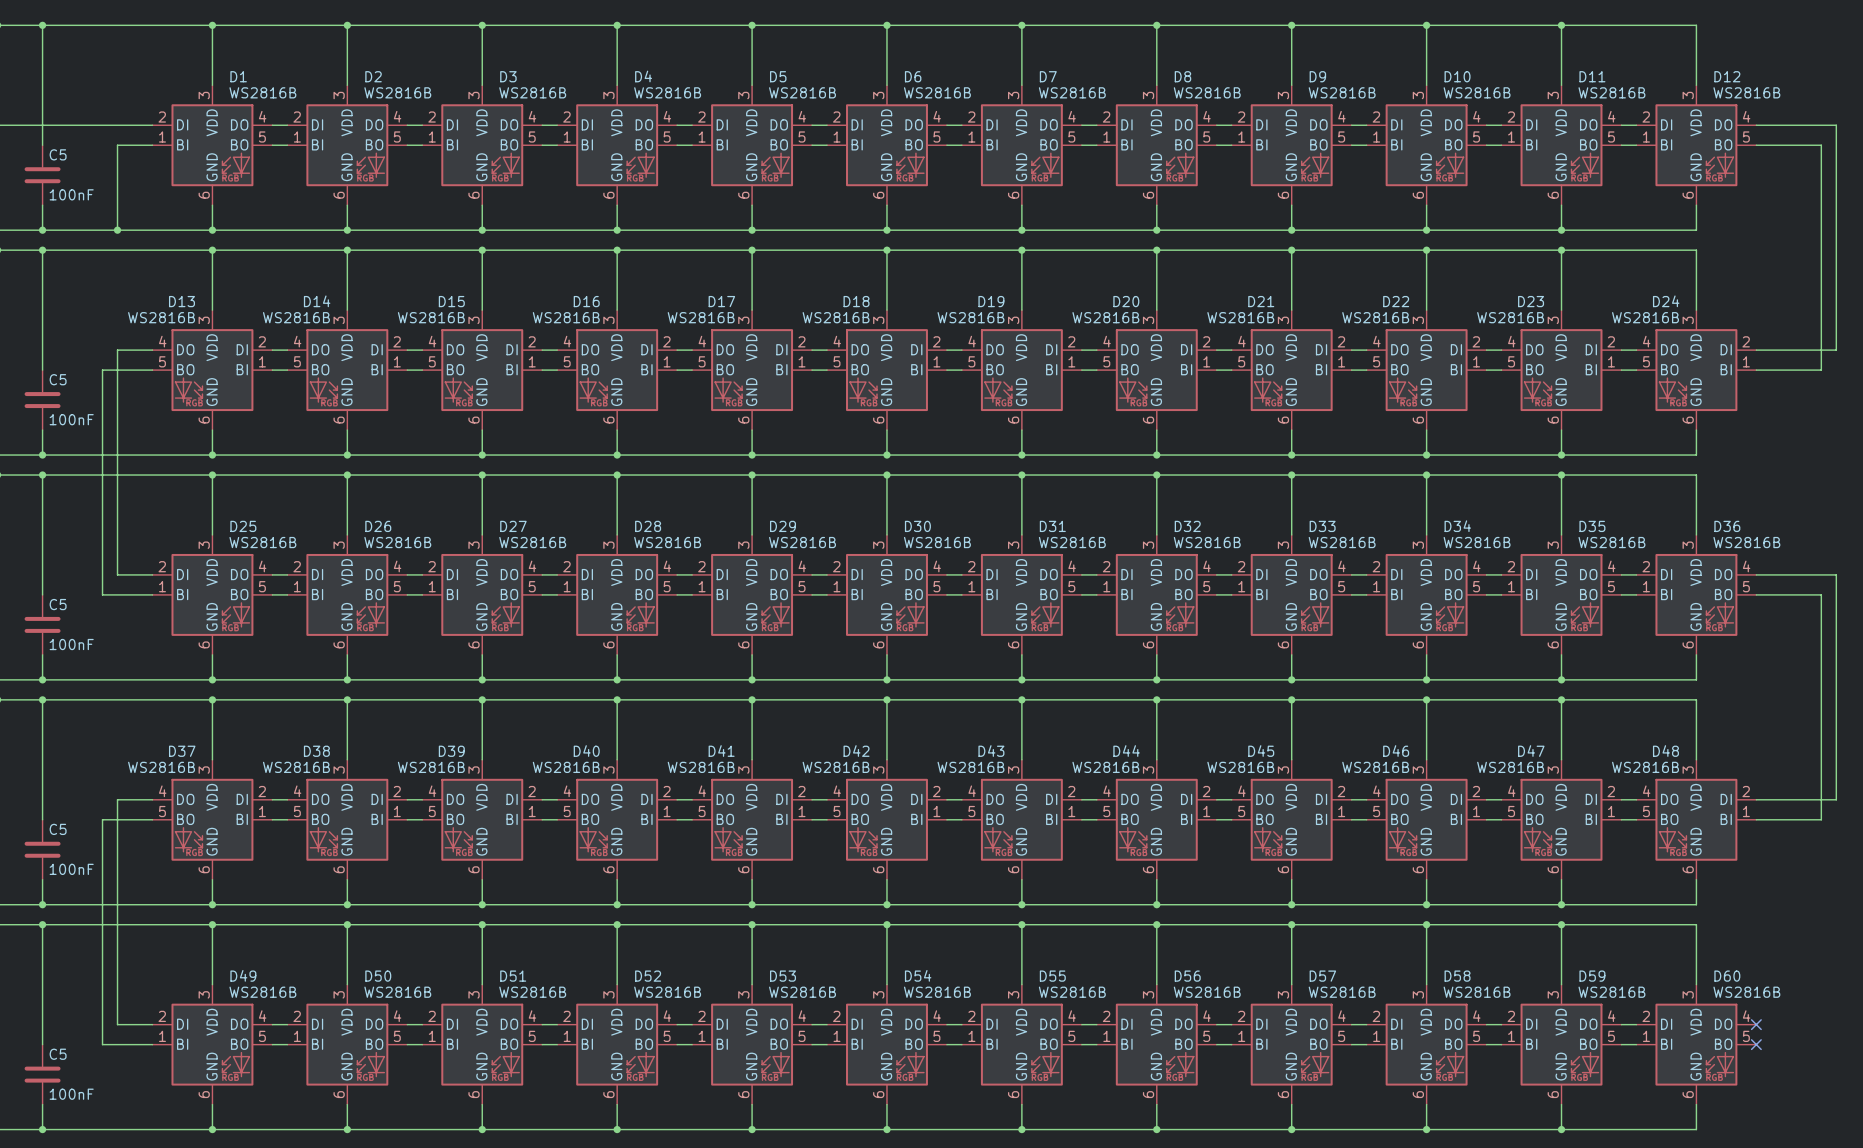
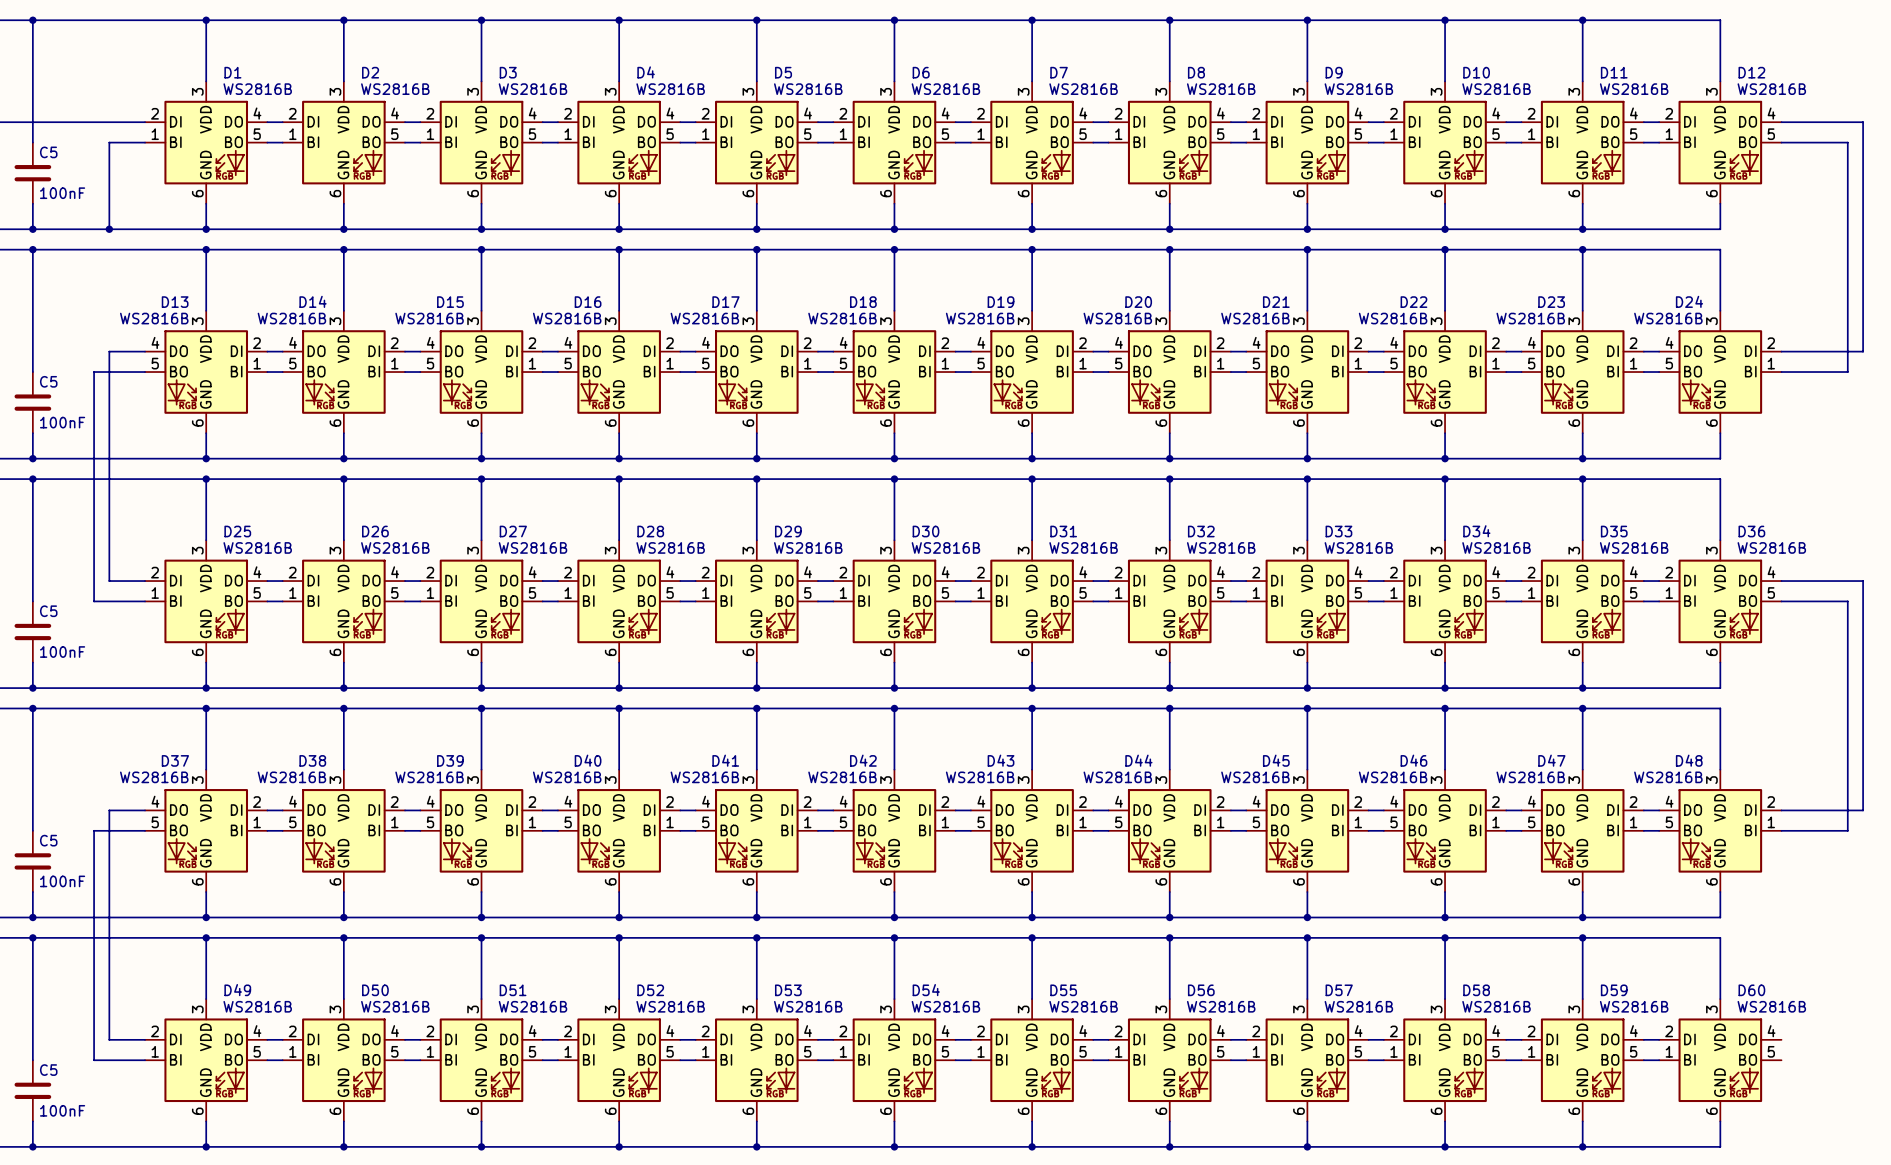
no-connect mark: (1756, 1024) -> none
no-connect mark: (1756, 1044) -> none

